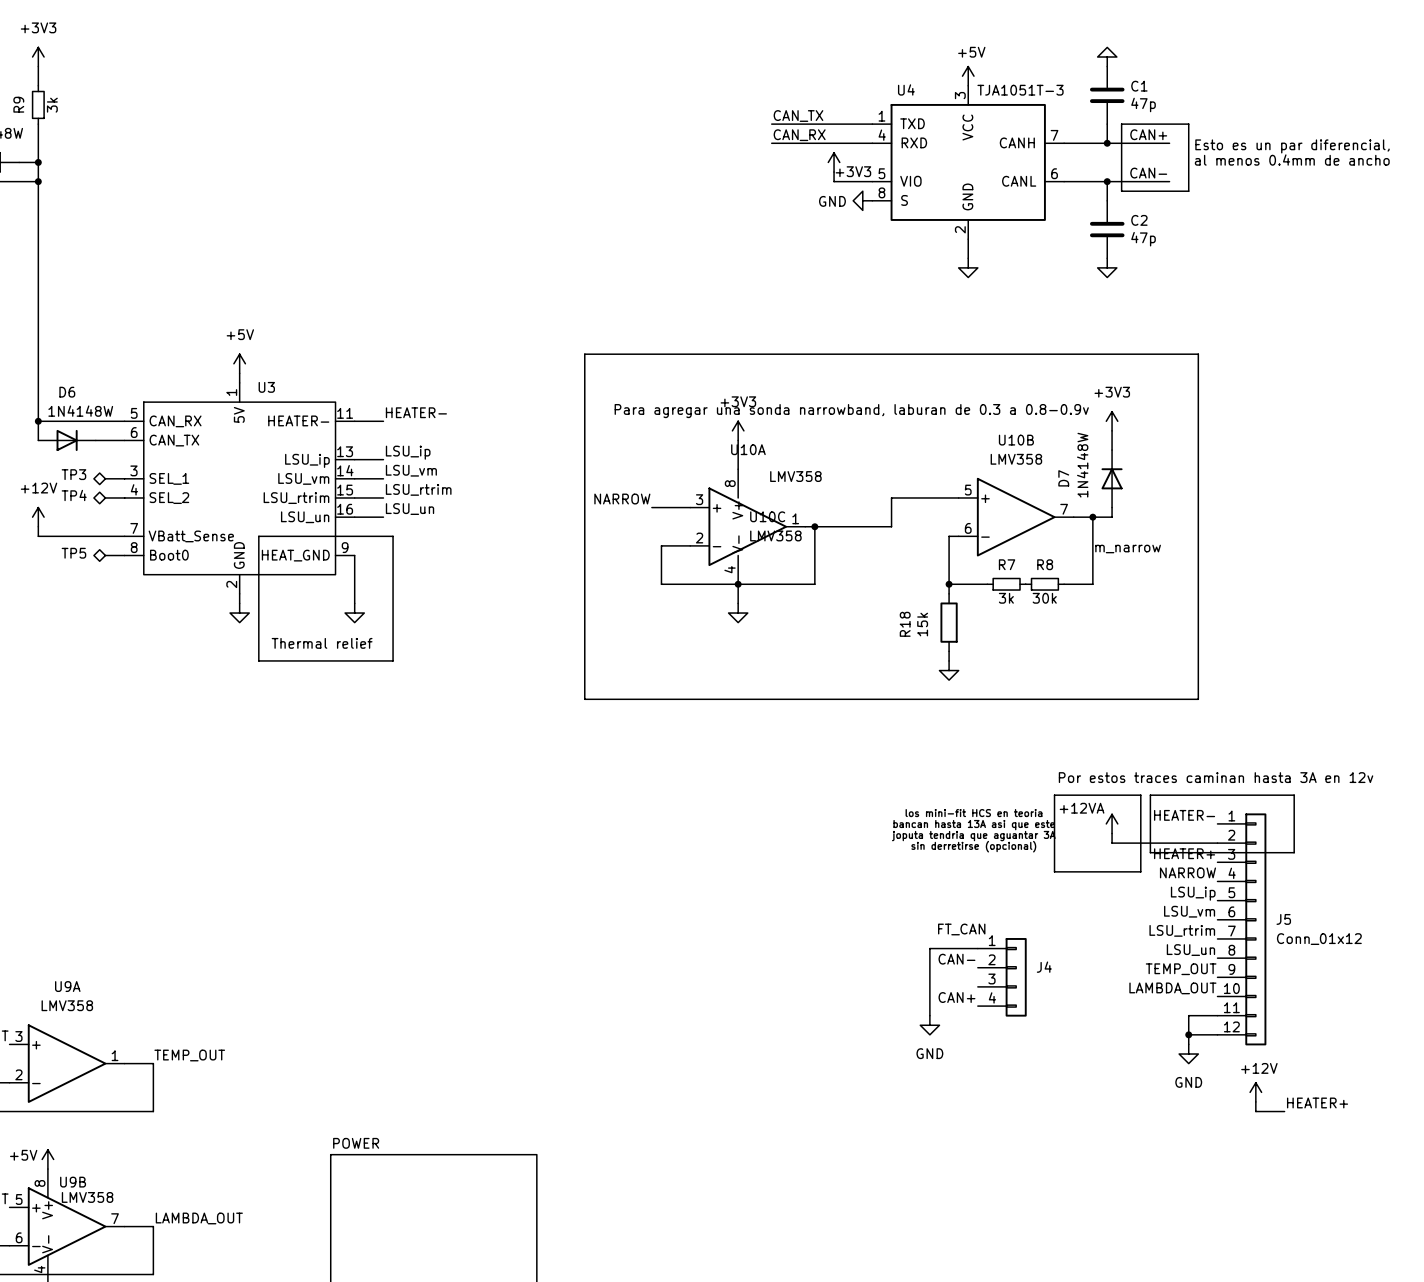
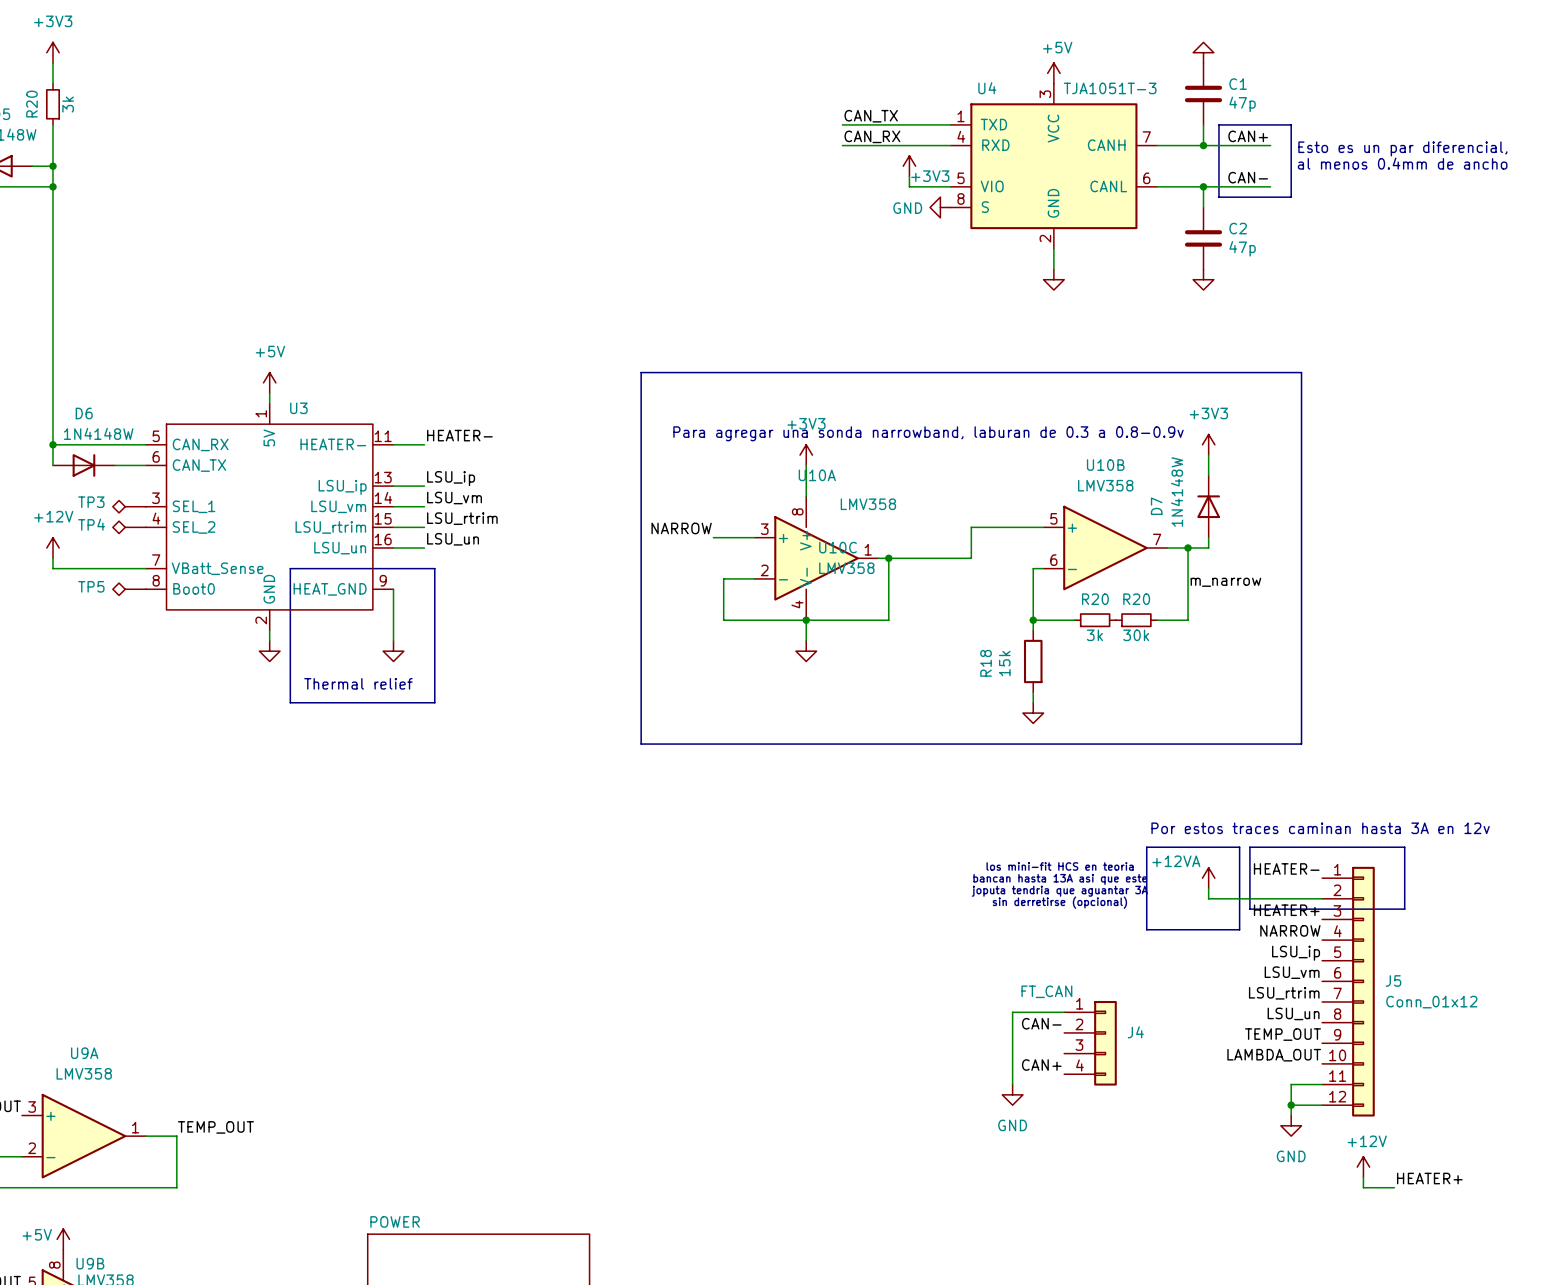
R9 name: R9 (18, 104) -> R20 (31, 104)
R7 name: R7 (1007, 564) -> R20 (1095, 599)
R8 name: R8 (1045, 564) -> R20 (1136, 599)

